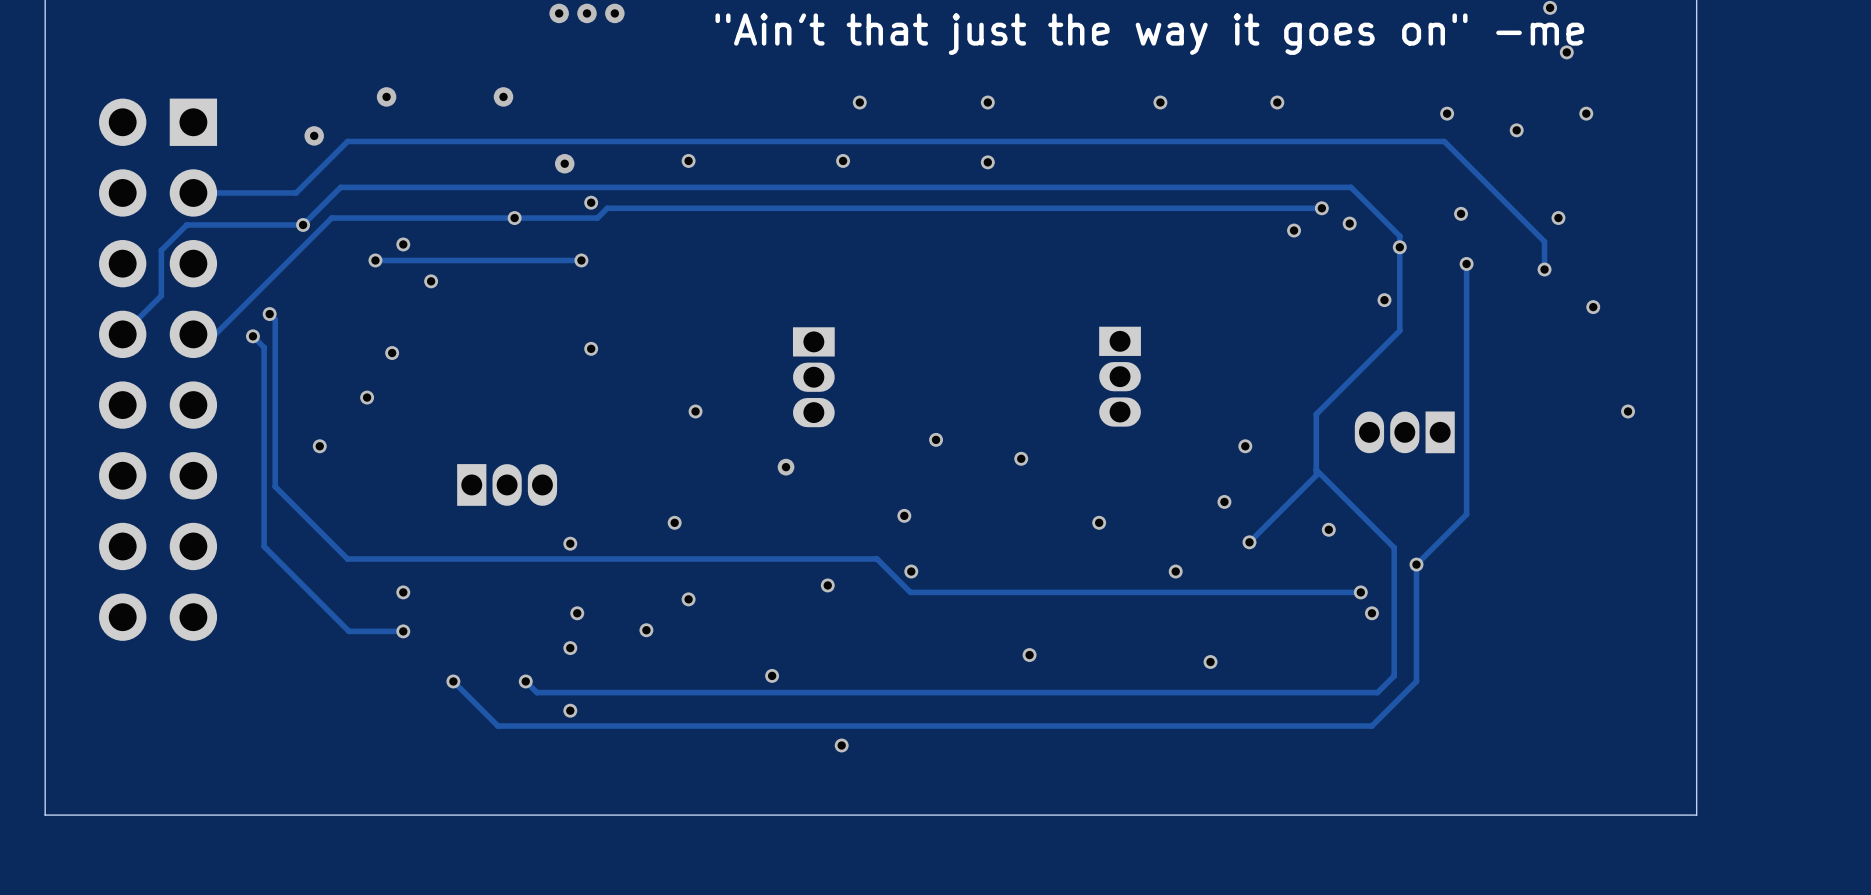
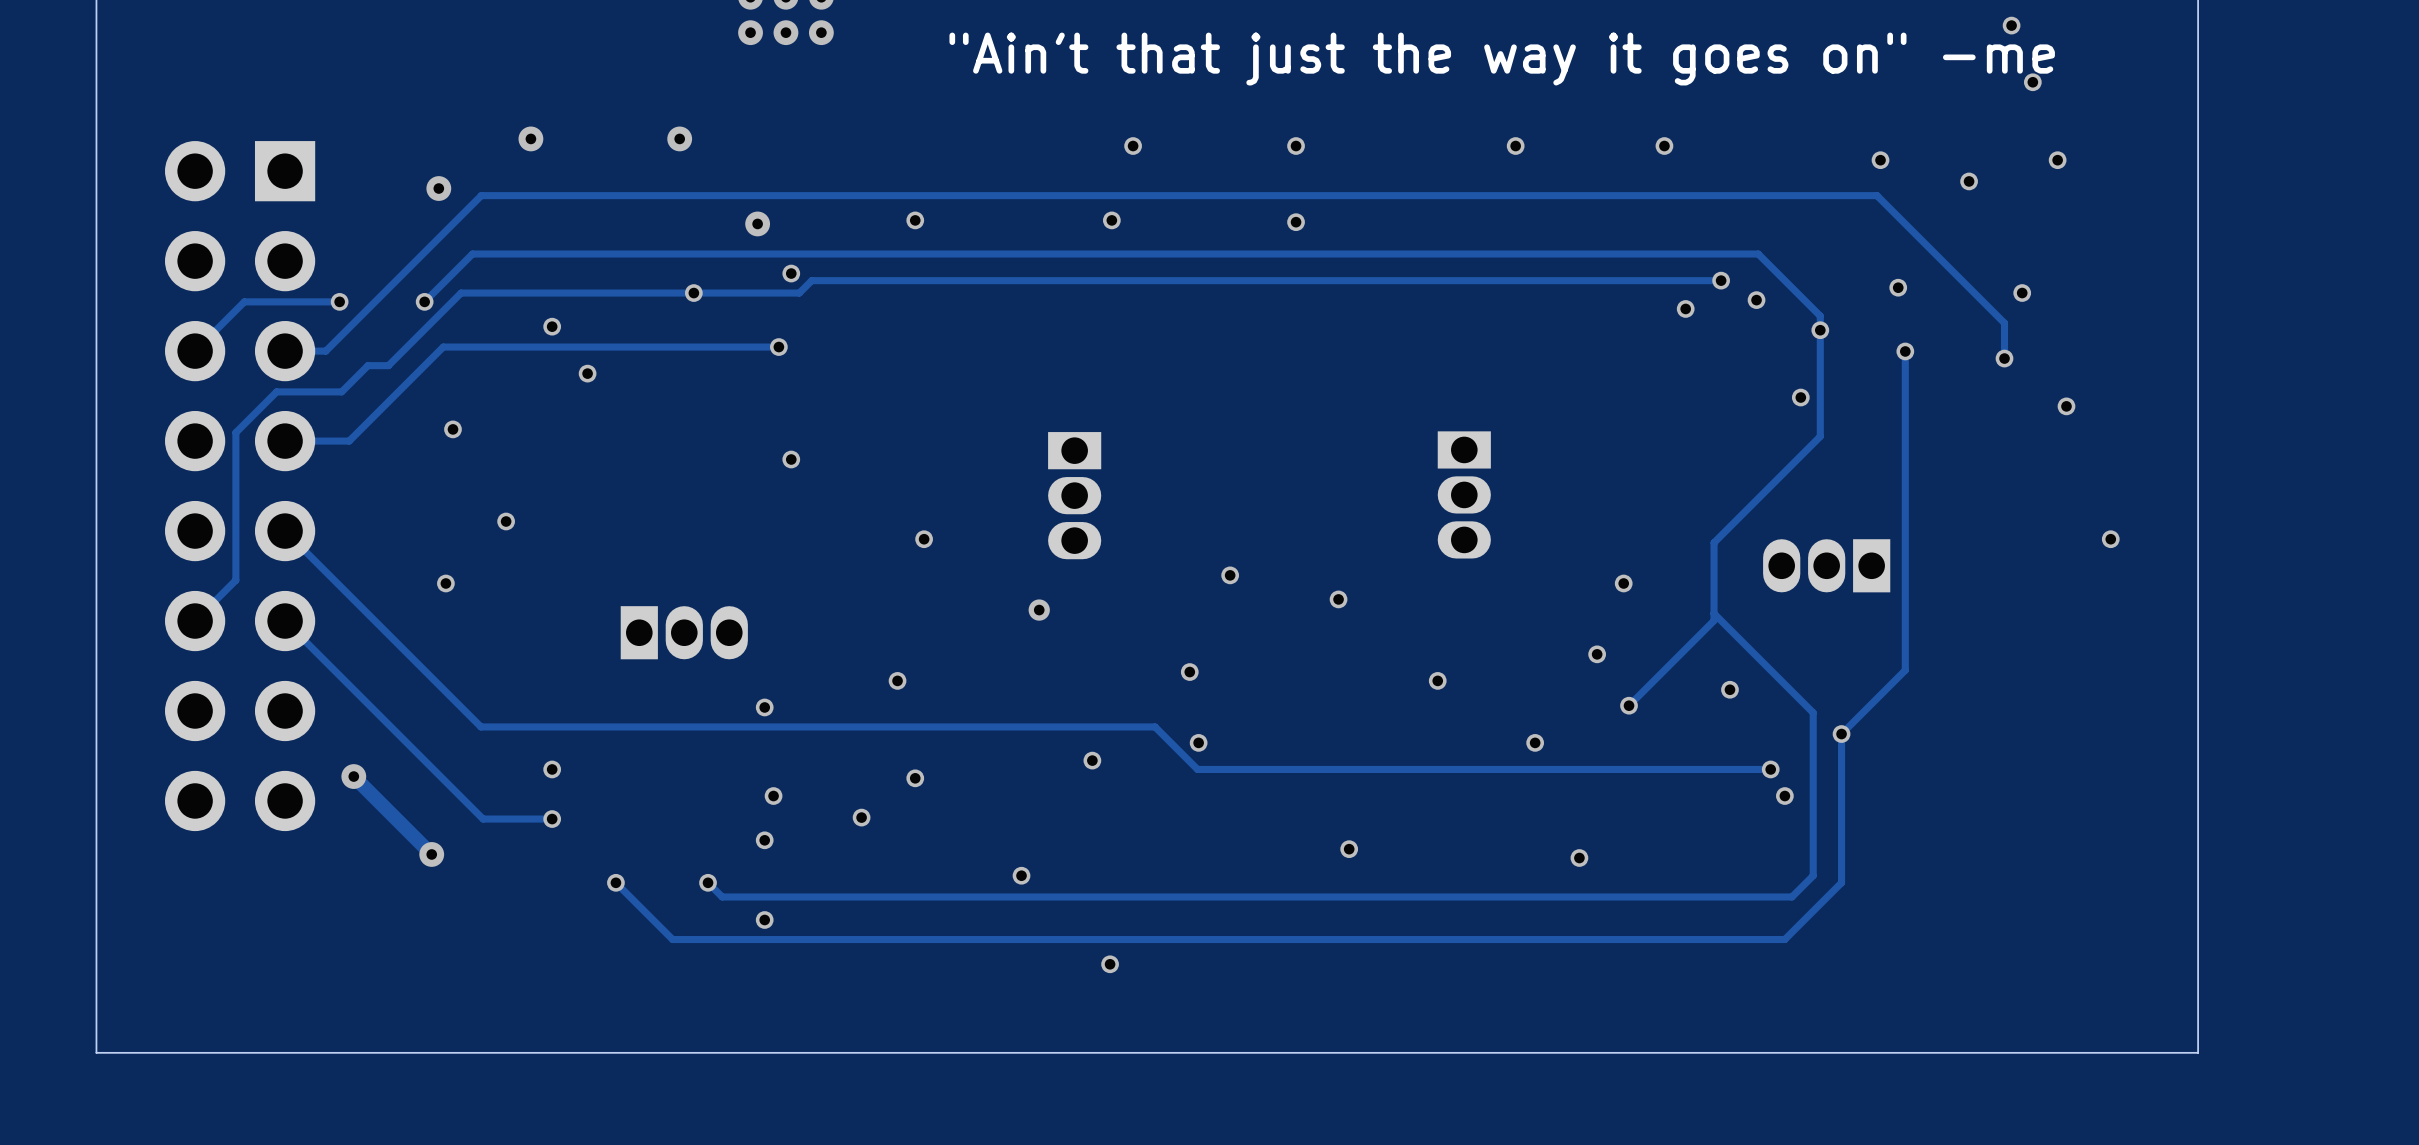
track: (296, 192) (193, 192) -> (415, 261) (325, 351) (285, 351)
track: (186, 224) (161, 250) (161, 295) (122, 334) -> (276, 301) (244, 301) (195, 351)
via: none -> (339, 301)
track: (303, 224) (236, 224) -> none
via: (375, 260) -> none
track: (274, 275) (215, 334) -> (516, 347) (443, 347) (349, 441) (313, 441)
track: none -> (388, 365) (367, 365) (341, 391) (276, 391) (235, 432) (235, 580) (195, 621)
track: (269, 314) (275, 319) (275, 486) (347, 559) -> (285, 531) (480, 726)
via: (269, 314) -> none
via: none -> (452, 429)
track: (252, 336) (264, 347) (264, 546) -> (285, 621) (375, 711)
via: (252, 336) -> none
via: (392, 353) -> none
track: none -> (353, 776) (431, 854)
via: none -> (353, 776)
via: none -> (431, 854)

